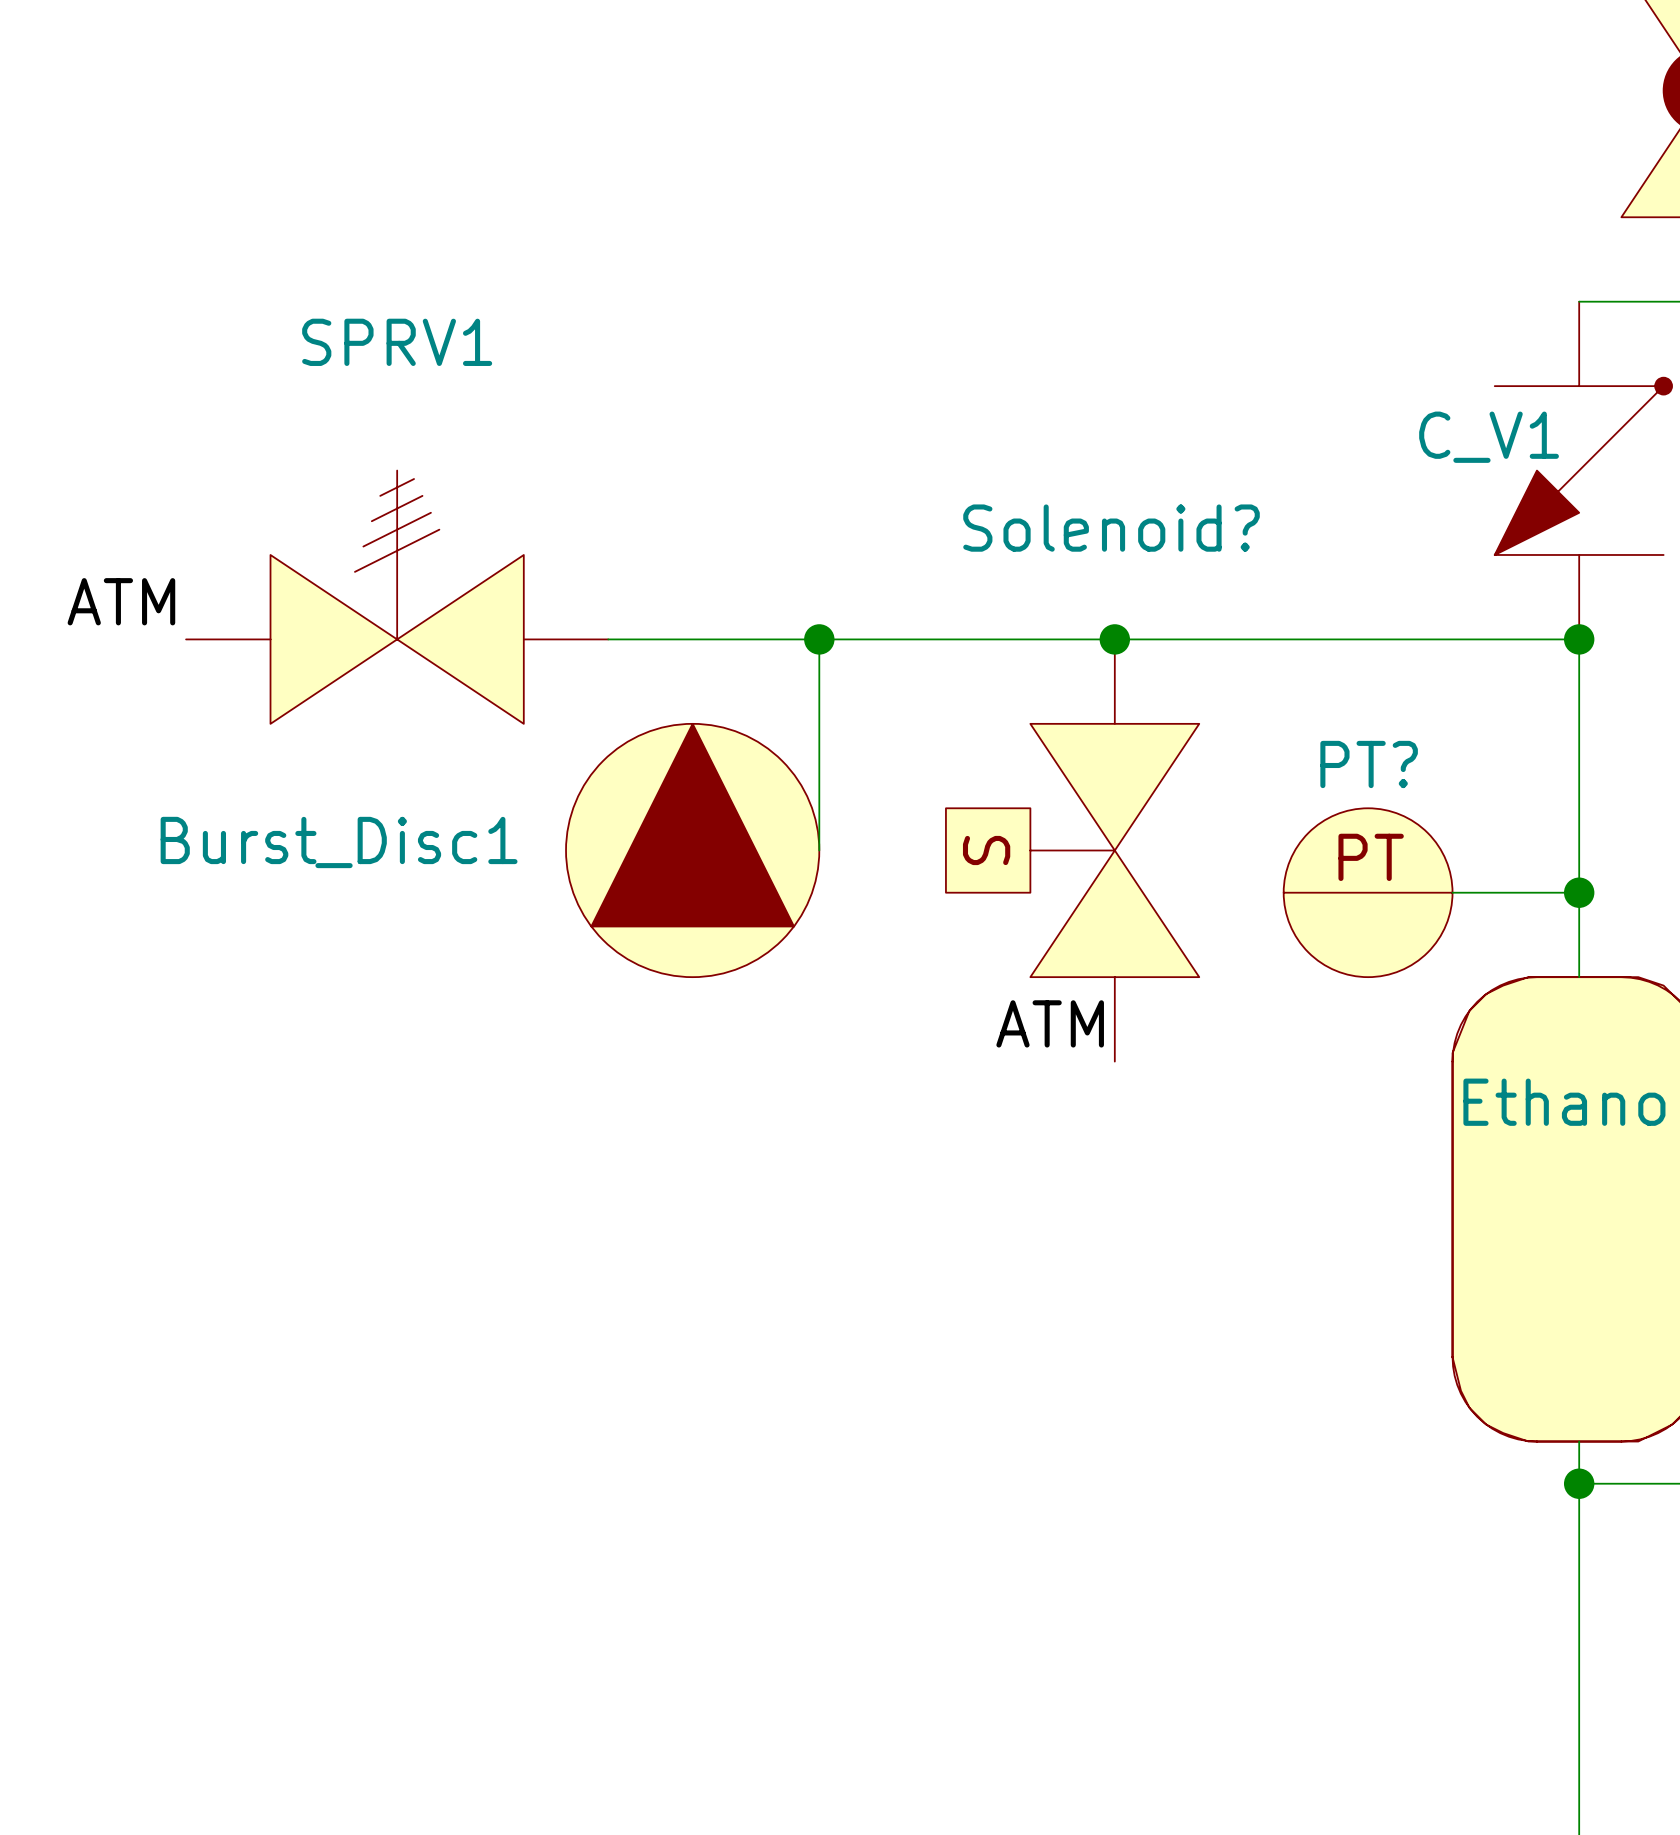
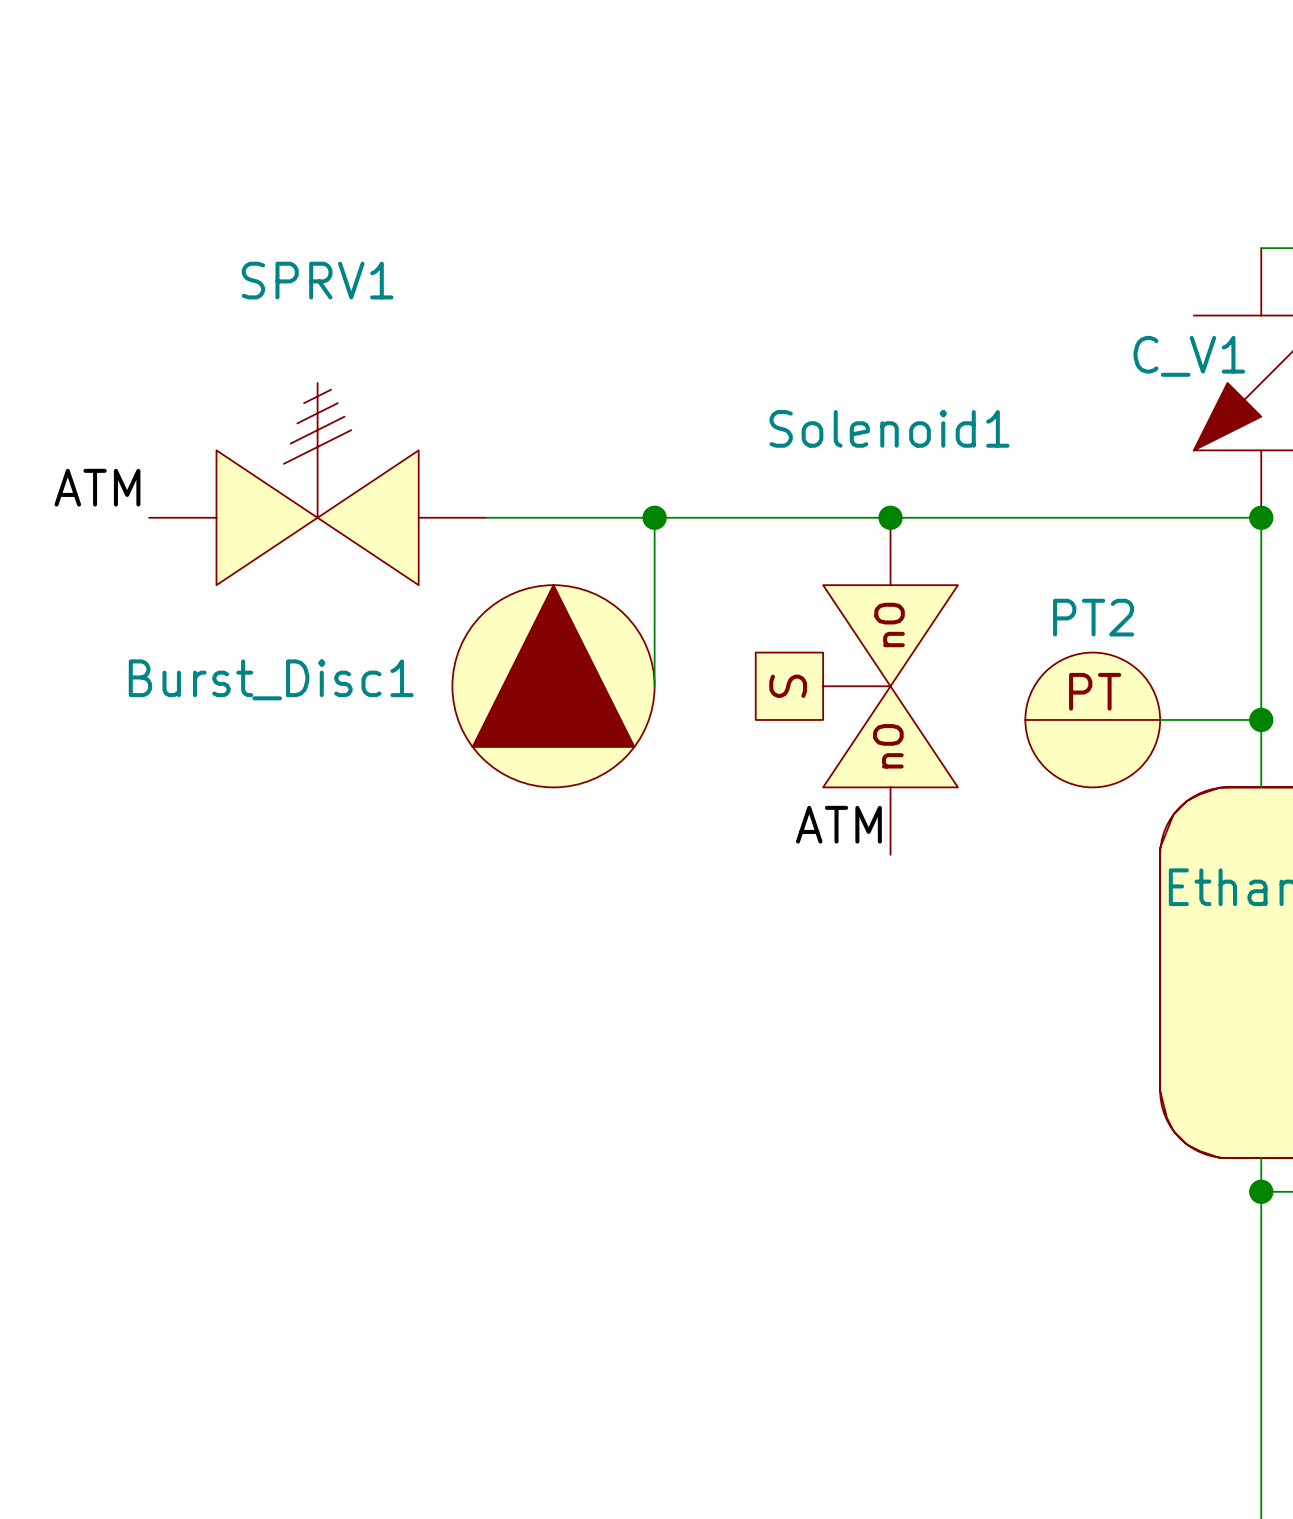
Solenoid? name: Solenoid? (1111, 528) -> Solenoid1 (889, 428)
PT? name: PT? (1369, 764) -> PT2 (1093, 617)
Solenoid? text: none -> nO (889, 624)
Solenoid? text: none -> nO (888, 746)

